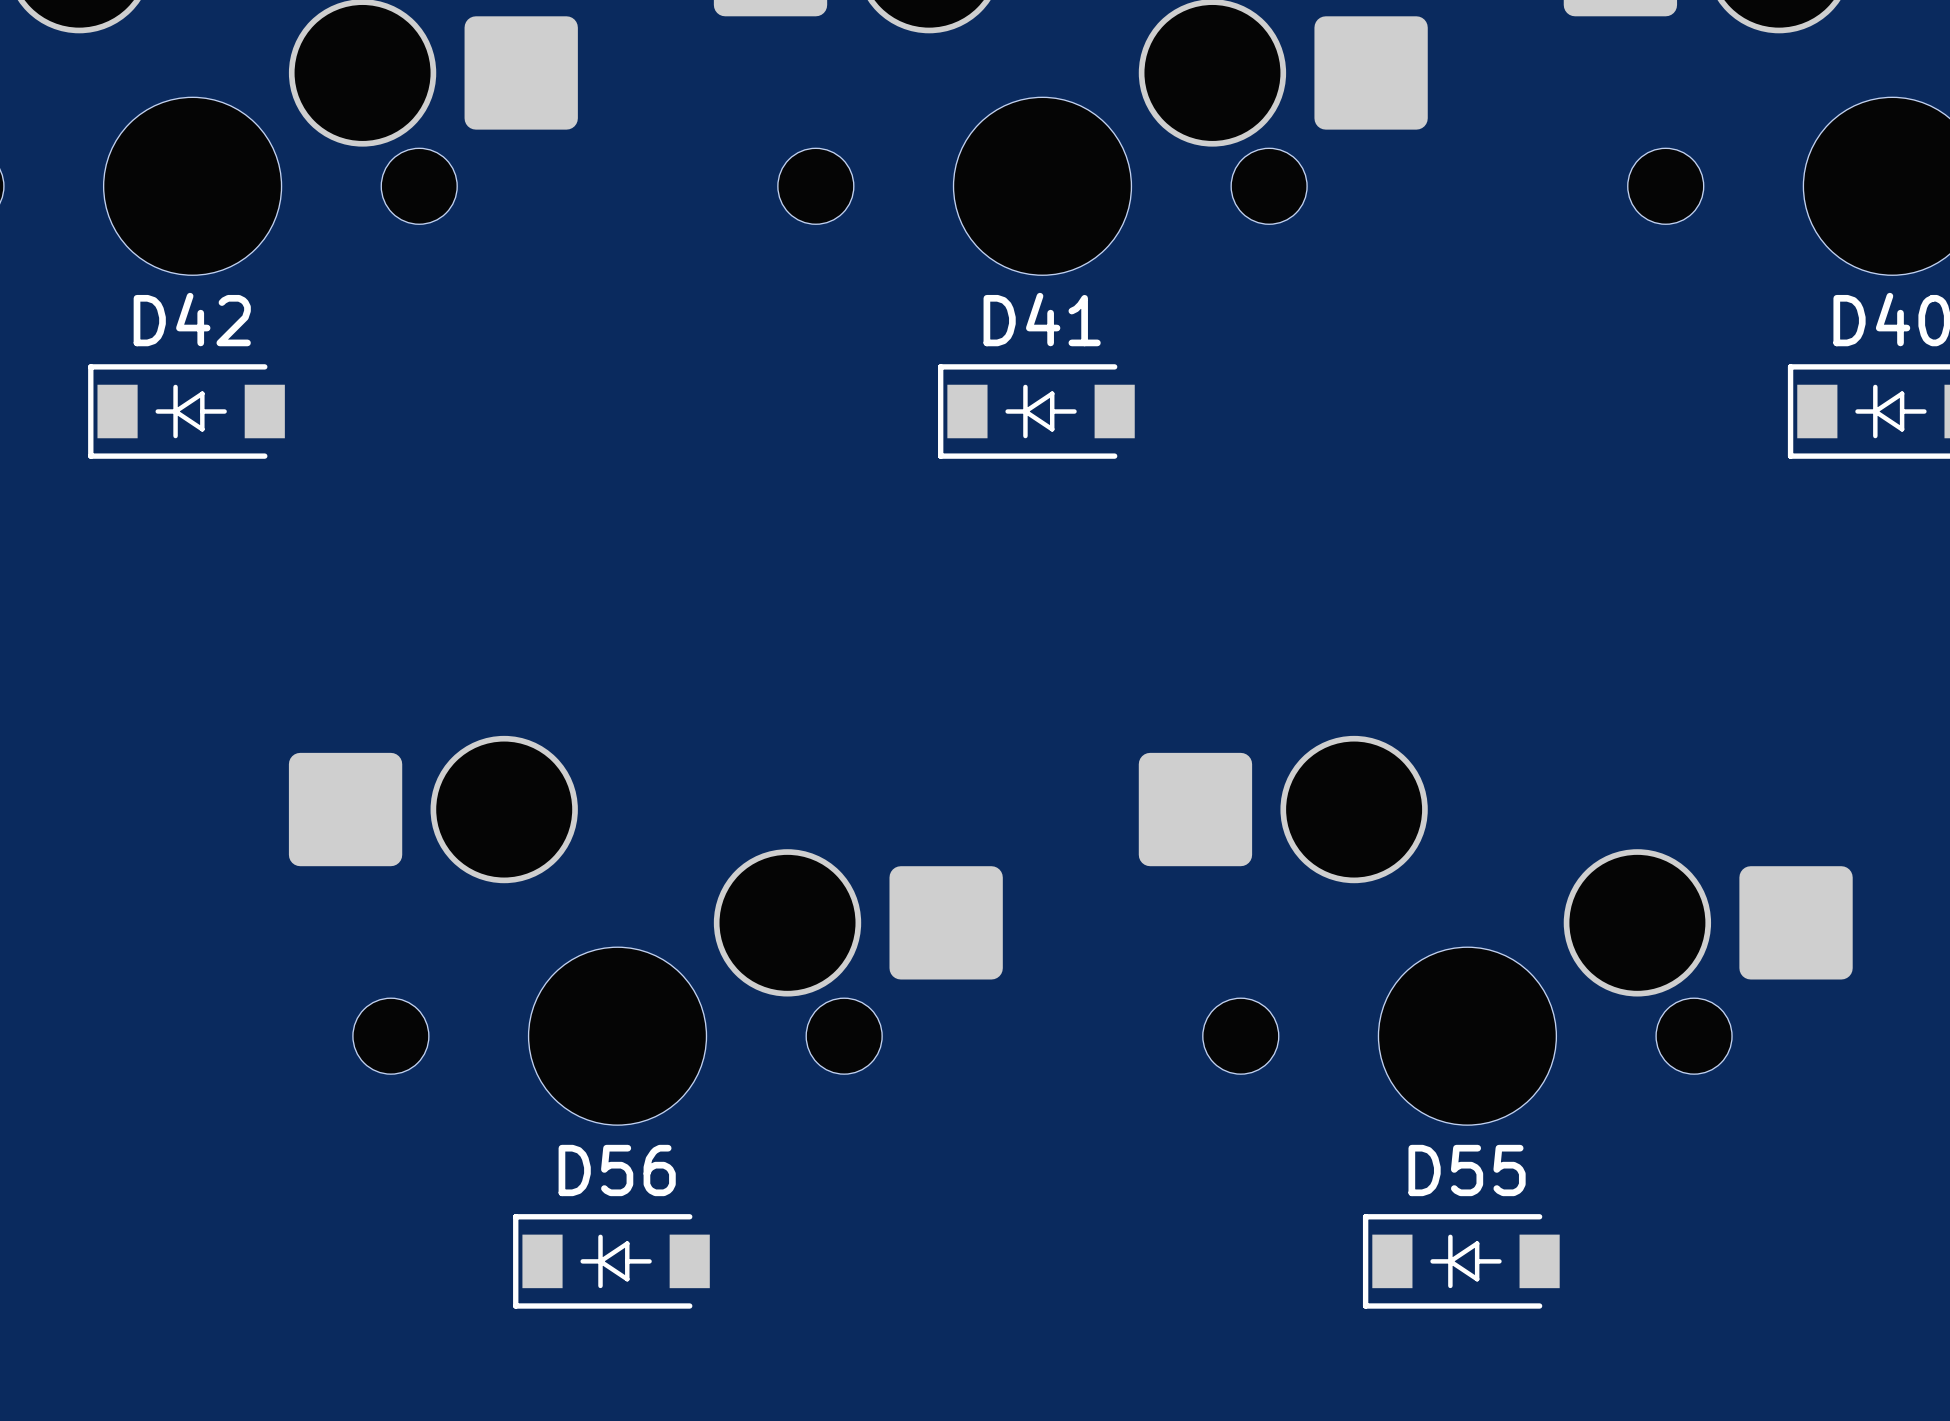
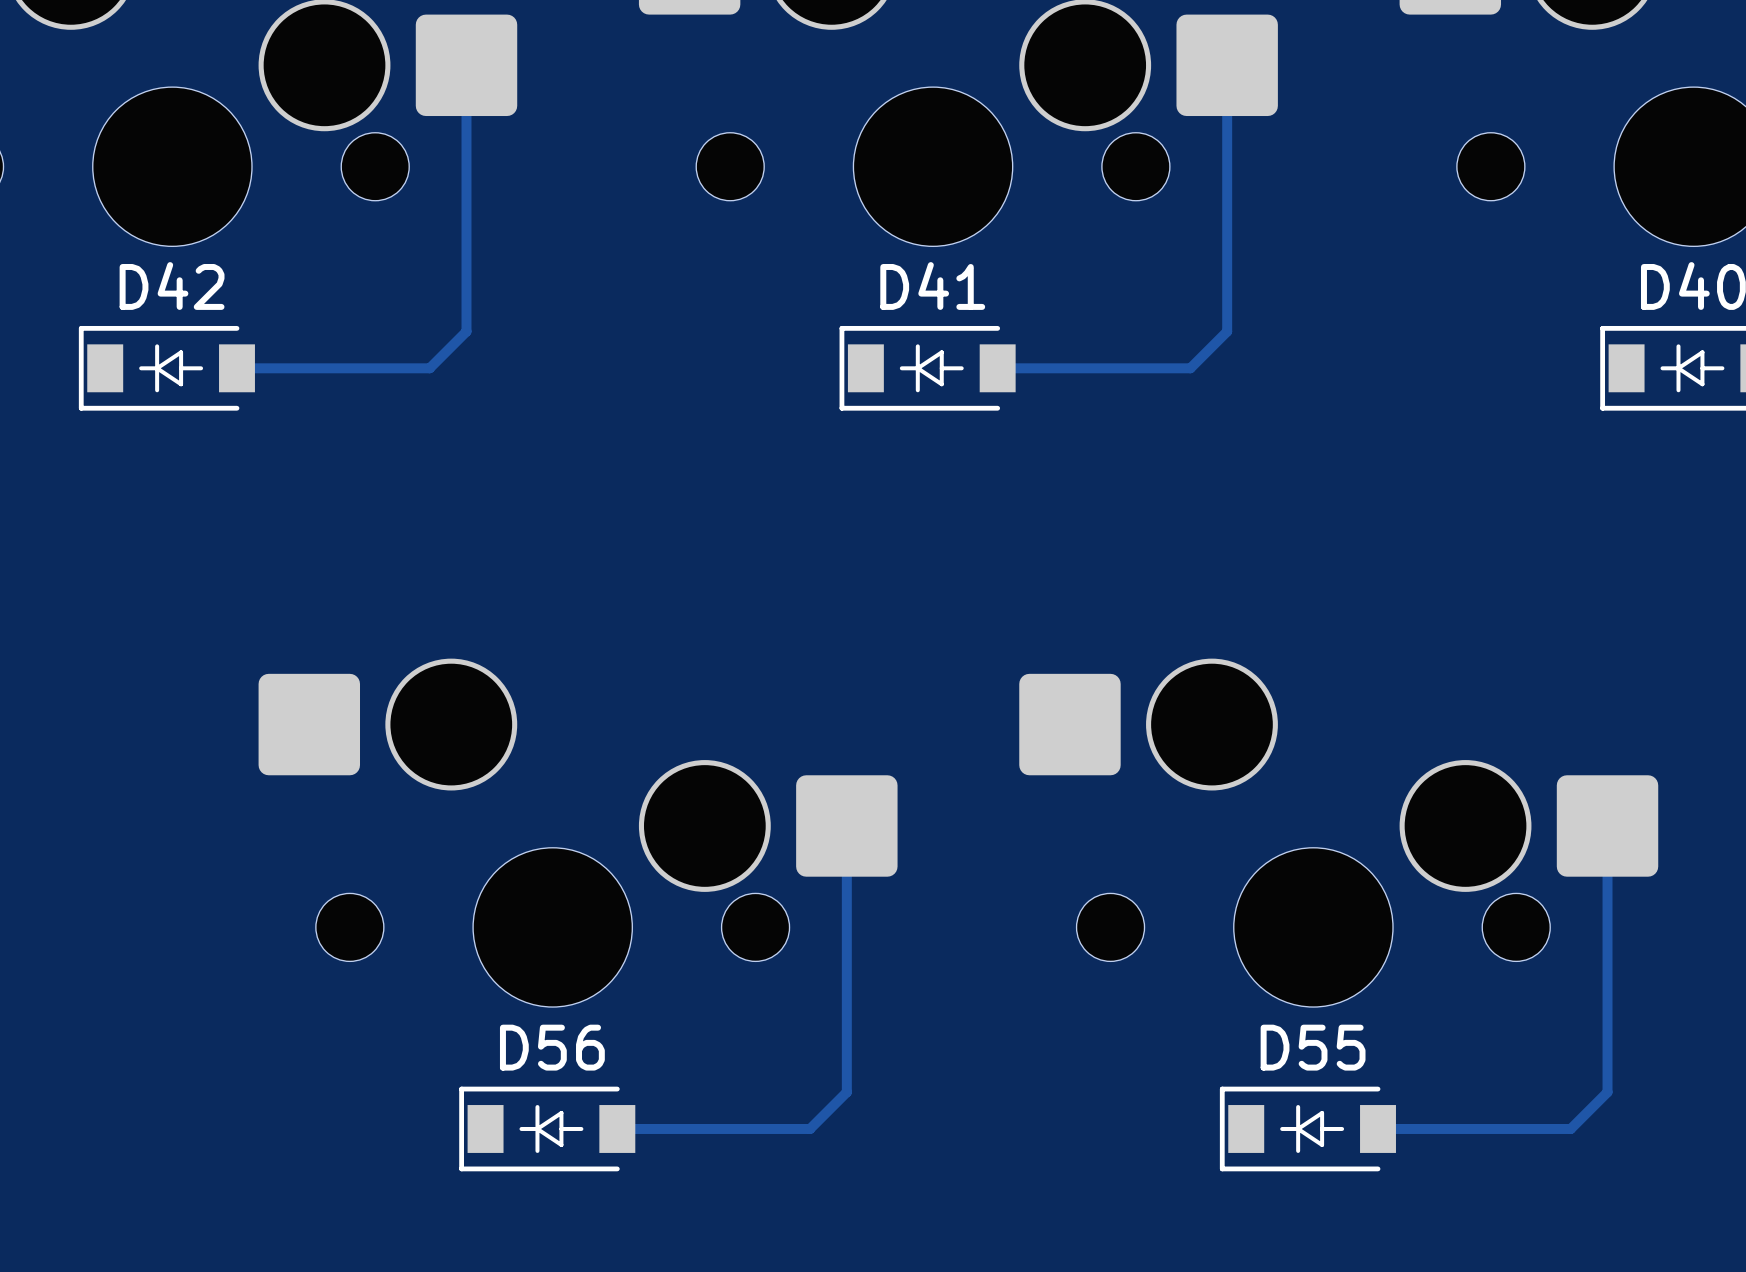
track: none -> (466, 65) (466, 331) (429, 368) (236, 368)
track: none -> (1227, 65) (1227, 331) (1190, 368) (997, 368)
track: none -> (846, 825) (846, 1092) (810, 1128) (617, 1128)
track: none -> (1607, 825) (1607, 1092) (1570, 1128) (1378, 1128)

